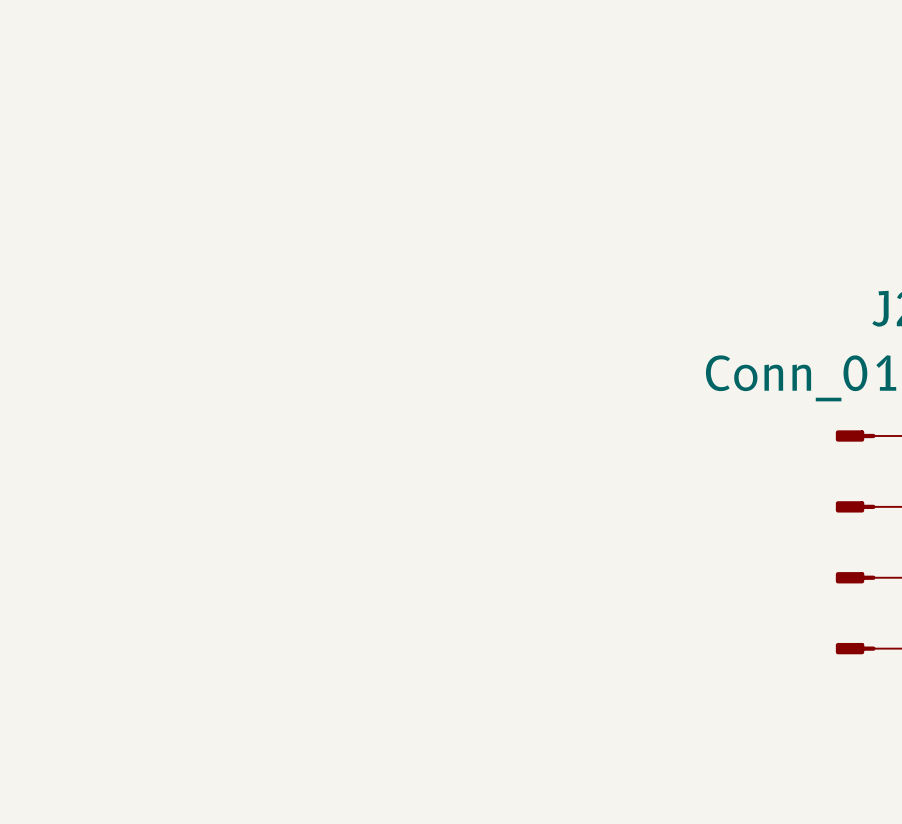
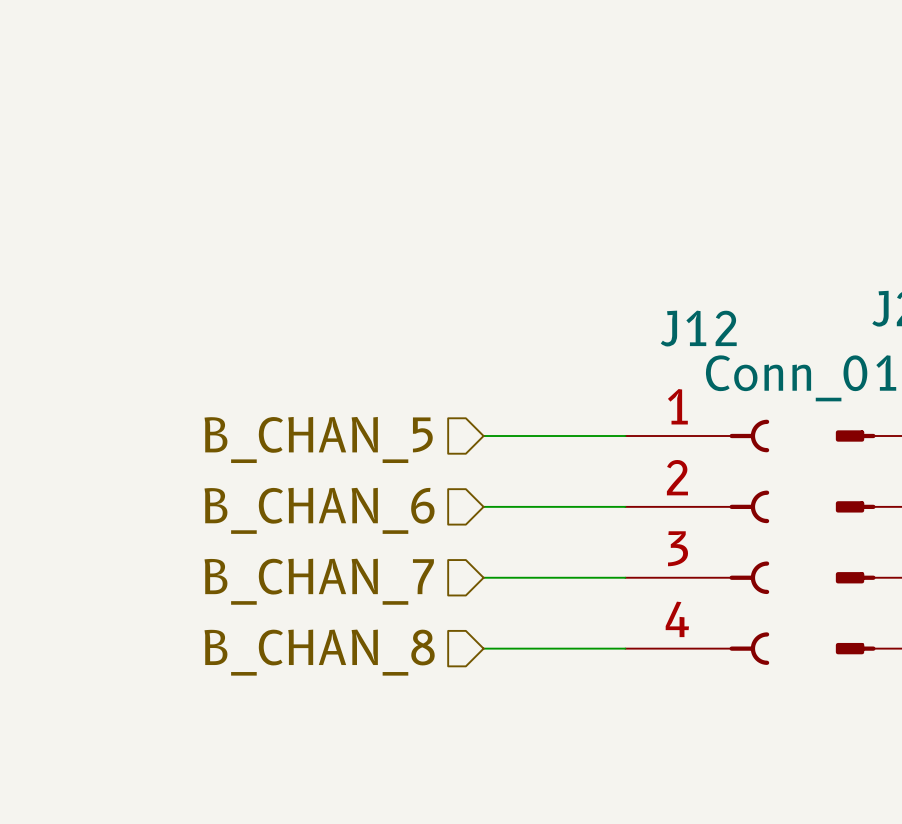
wire: none -> (483, 436) (625, 436)
hierarchical label: none -> B_CHAN_5 (318, 439)
wire: none -> (483, 506) (625, 506)
hierarchical label: none -> B_CHAN_6 (319, 510)
J12: none -> (697, 542)
wire: none -> (483, 577) (625, 577)
hierarchical label: none -> B_CHAN_7 (319, 581)
wire: none -> (483, 648) (625, 648)
hierarchical label: none -> B_CHAN_8 (319, 652)

